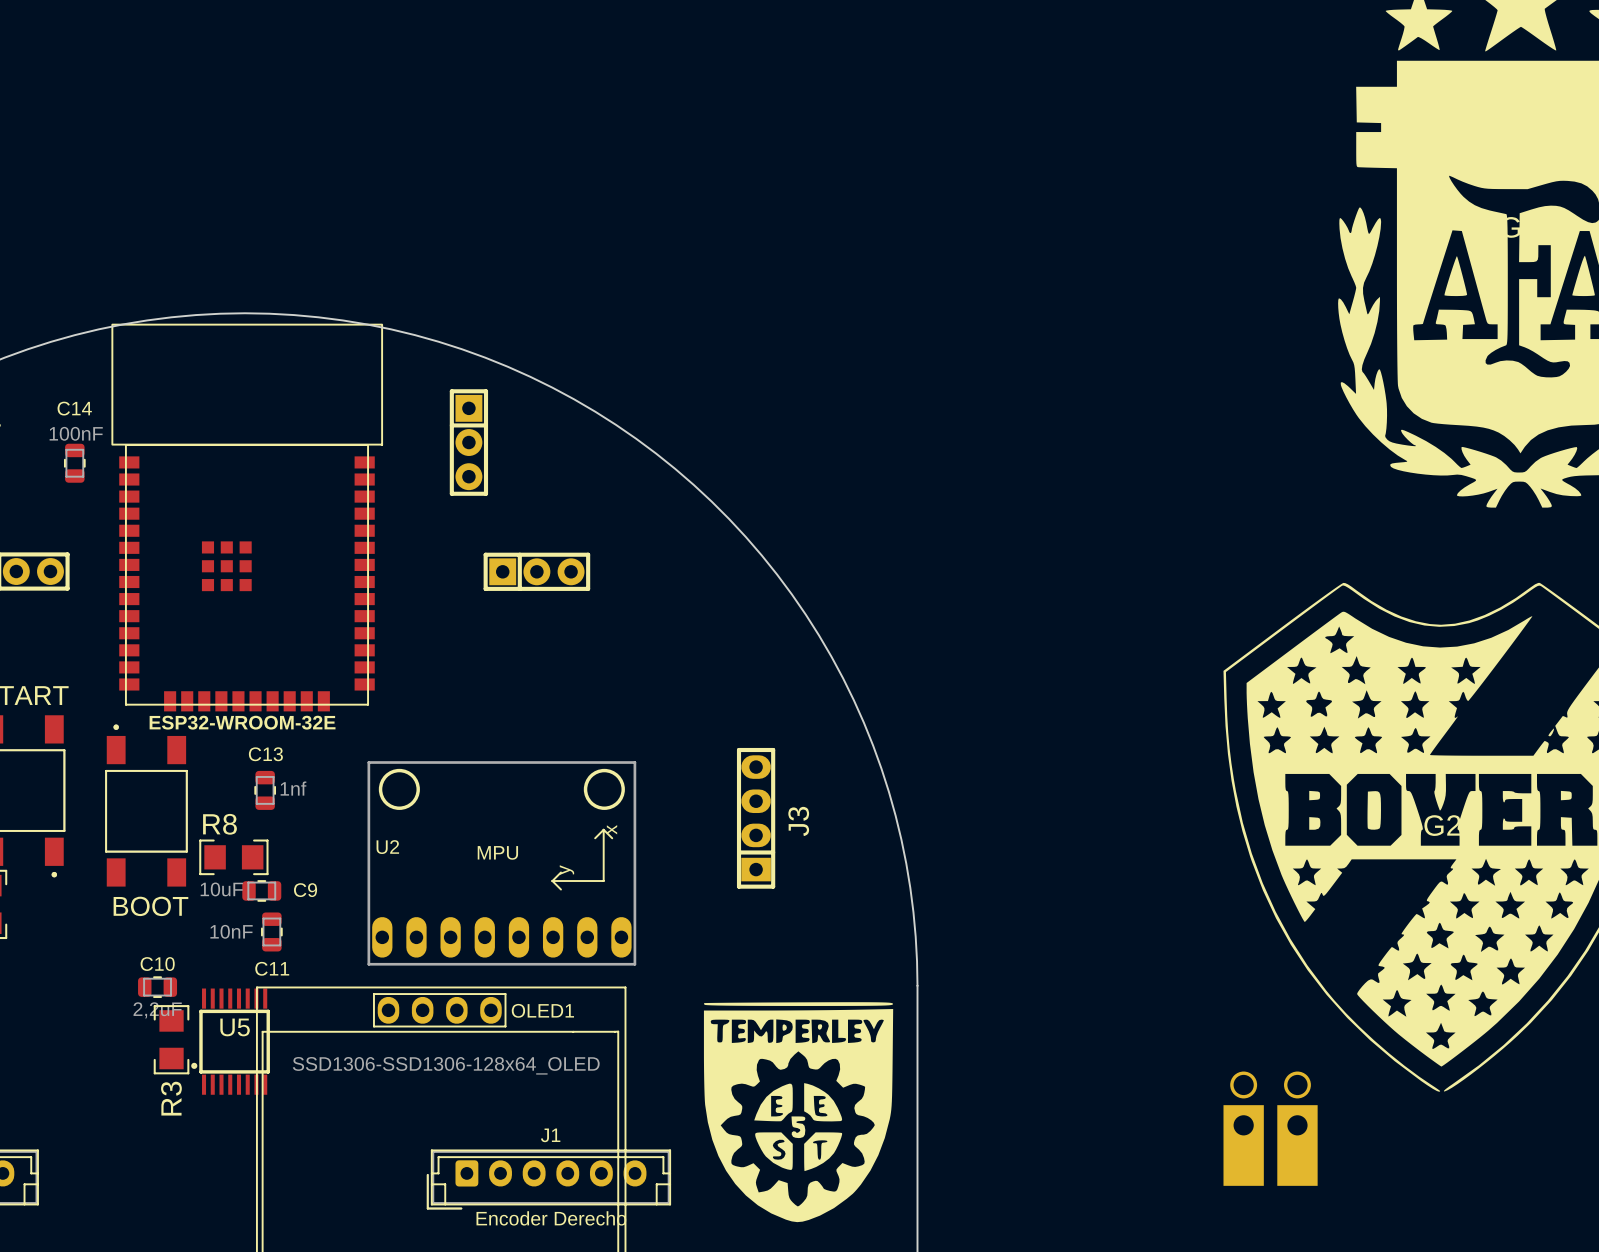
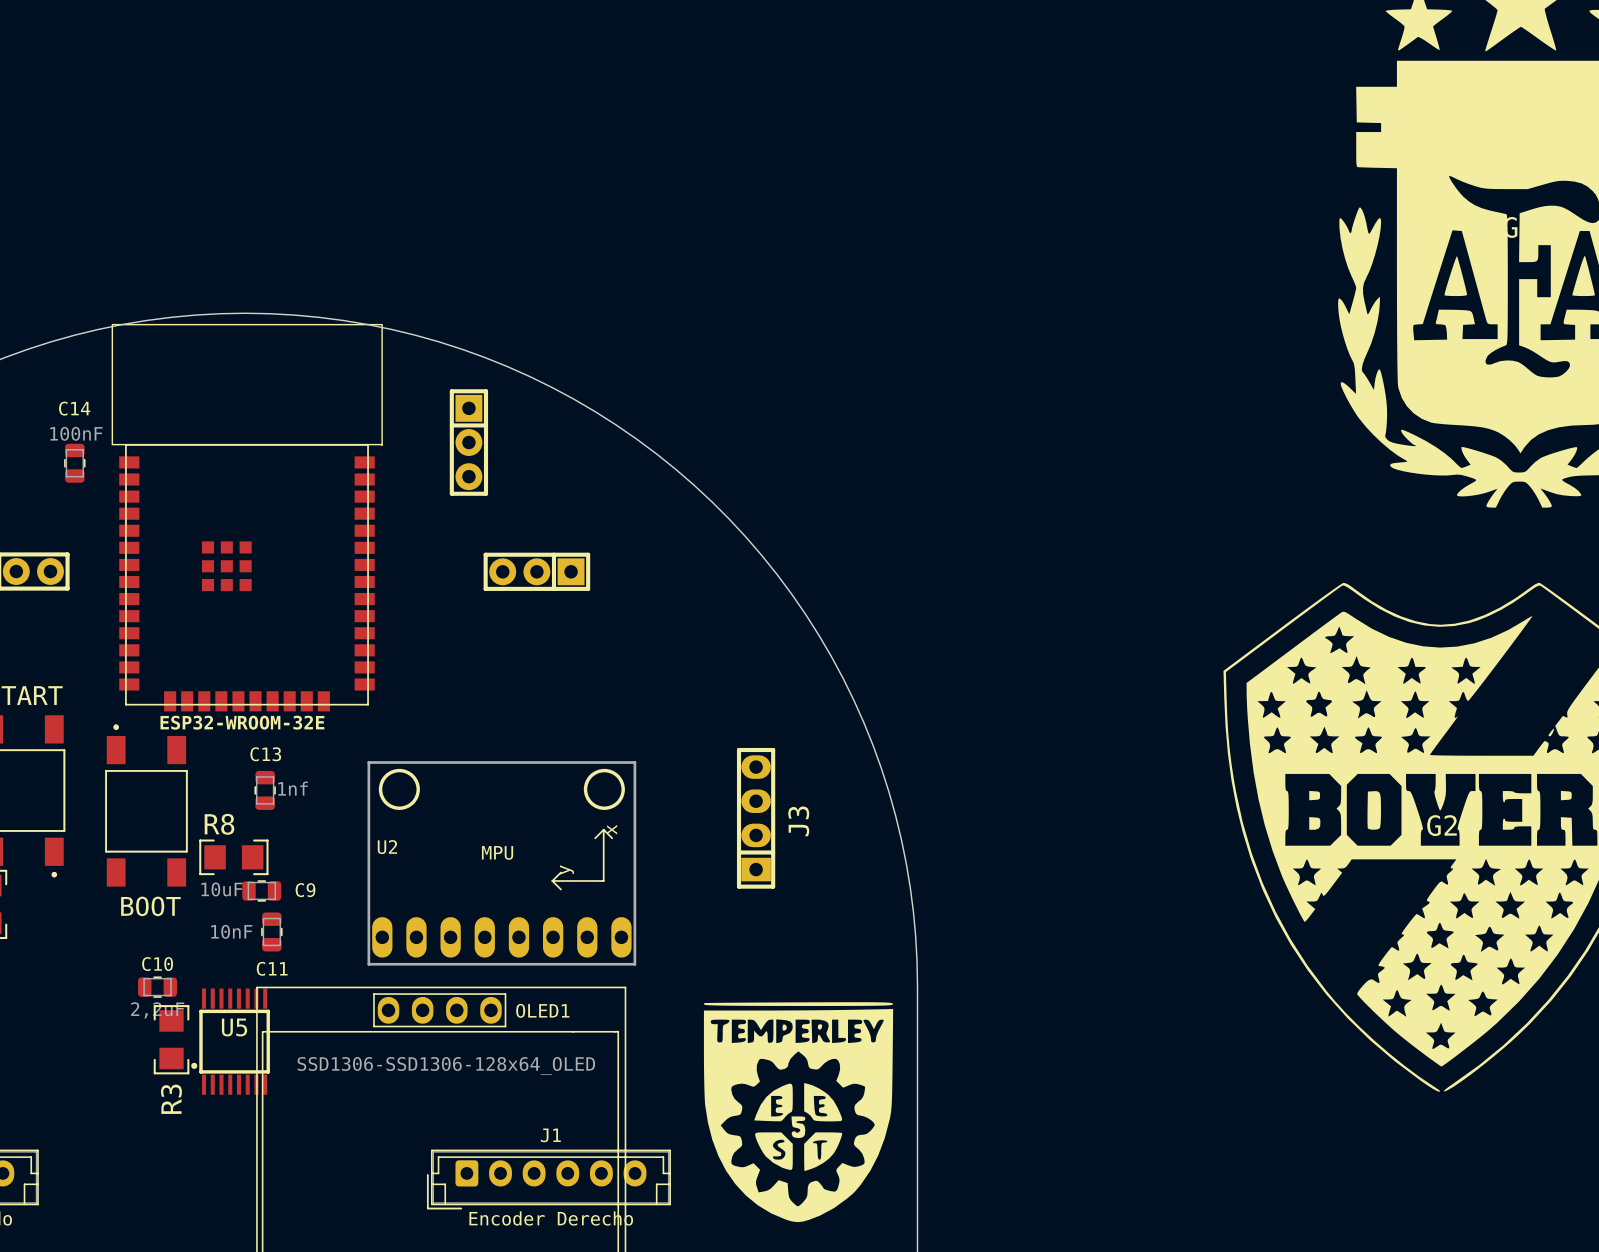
part rotation: 0° (536, 571) -> 180° (536, 571)
part: (1243, 1128) -> none
part: (1297, 1128) -> none

